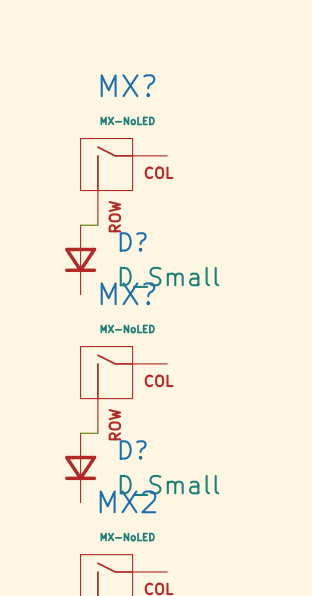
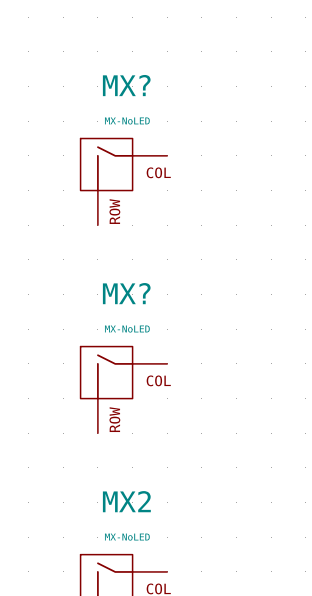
wire: (80, 225) (97, 225) -> none
D?: D_Small (80, 259) -> none
wire: (80, 433) (97, 433) -> none
D?: D_Small (80, 467) -> none

